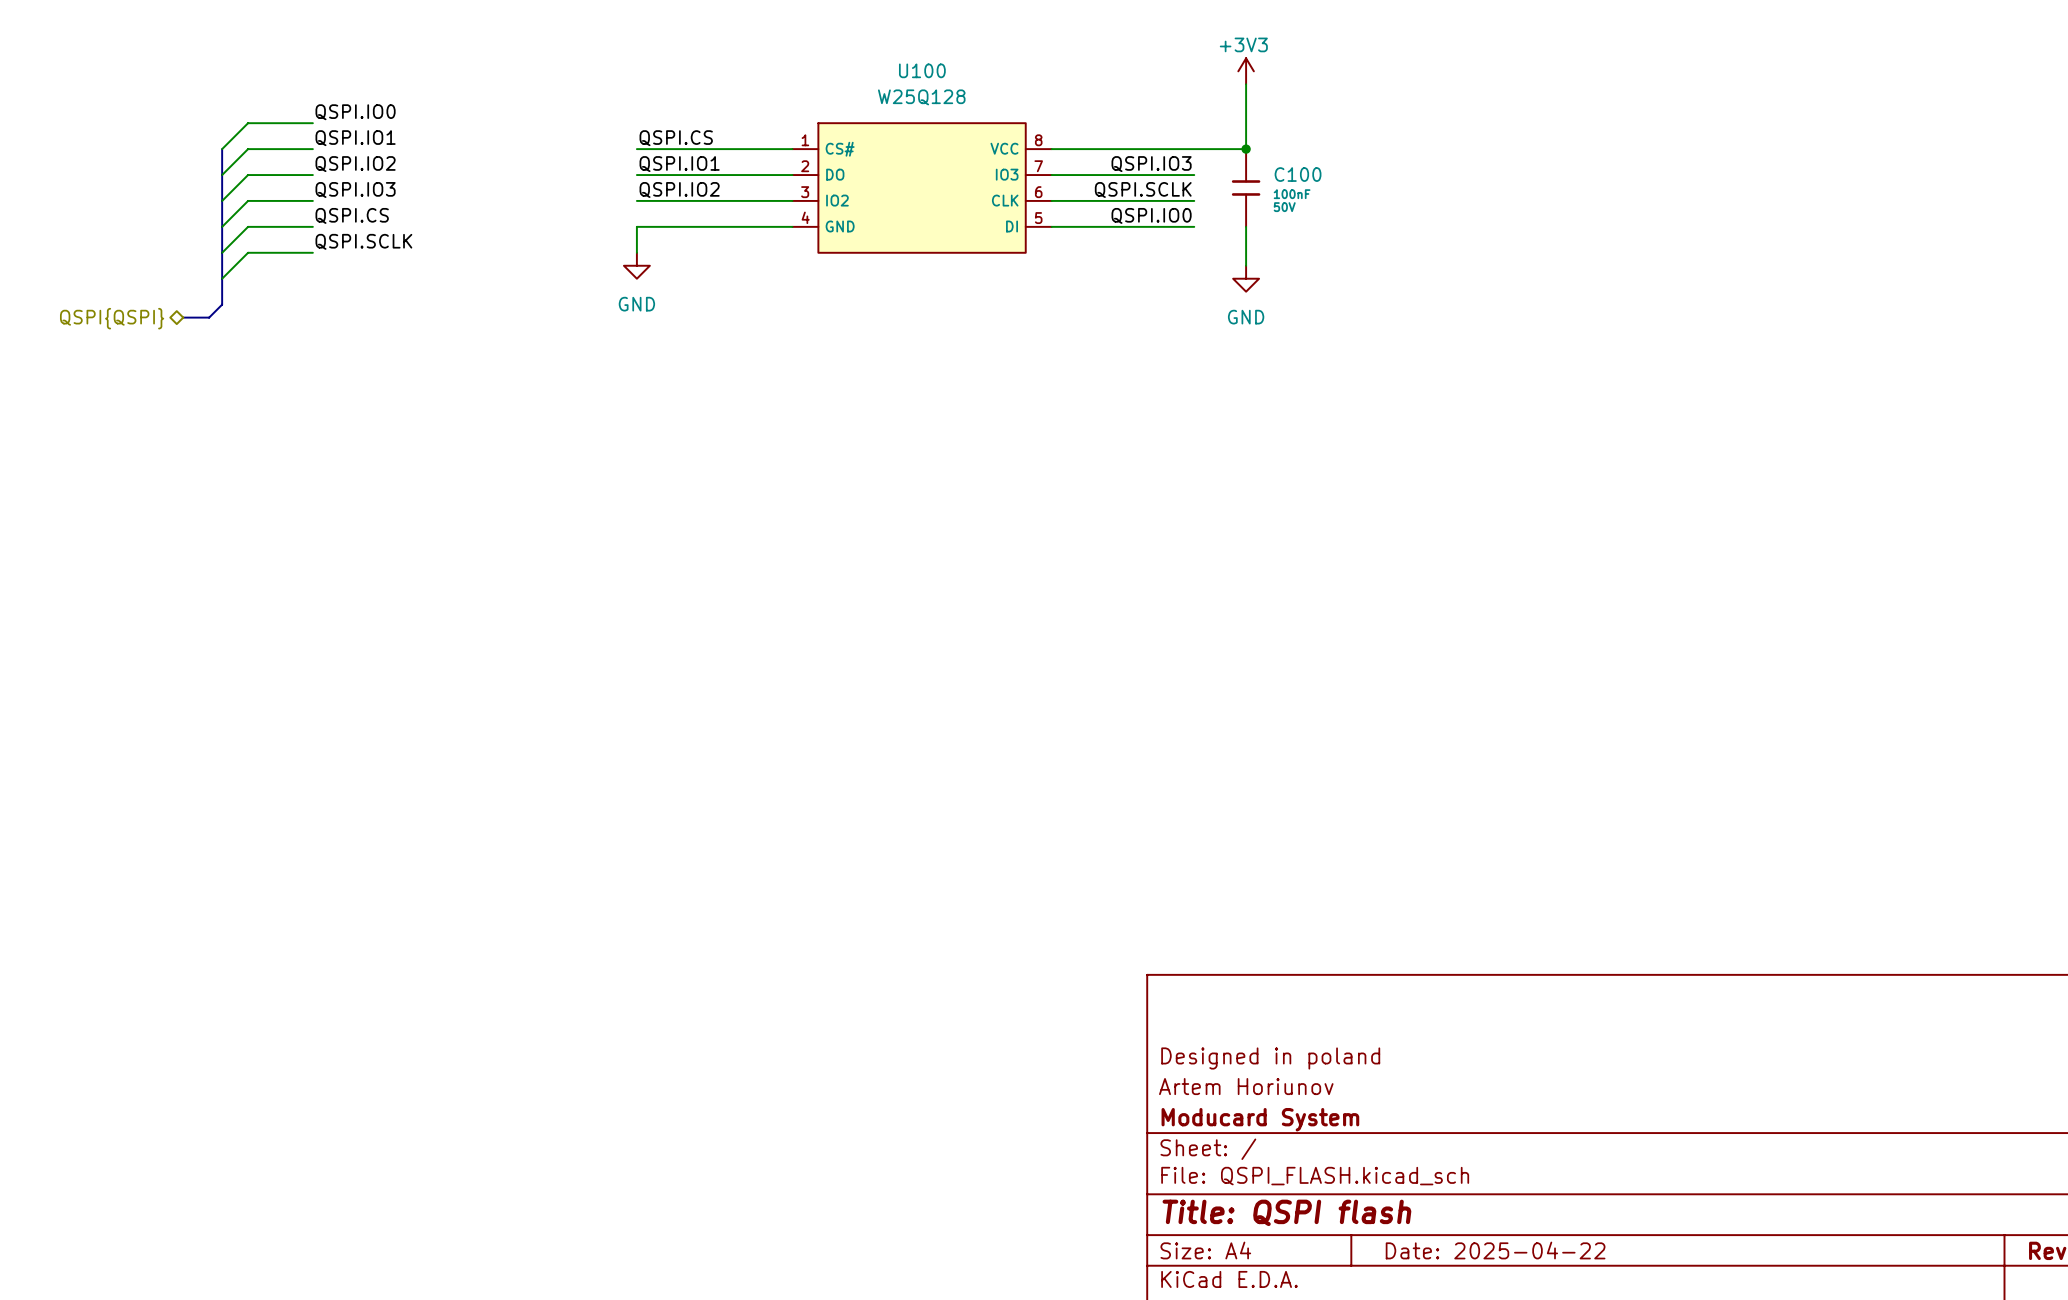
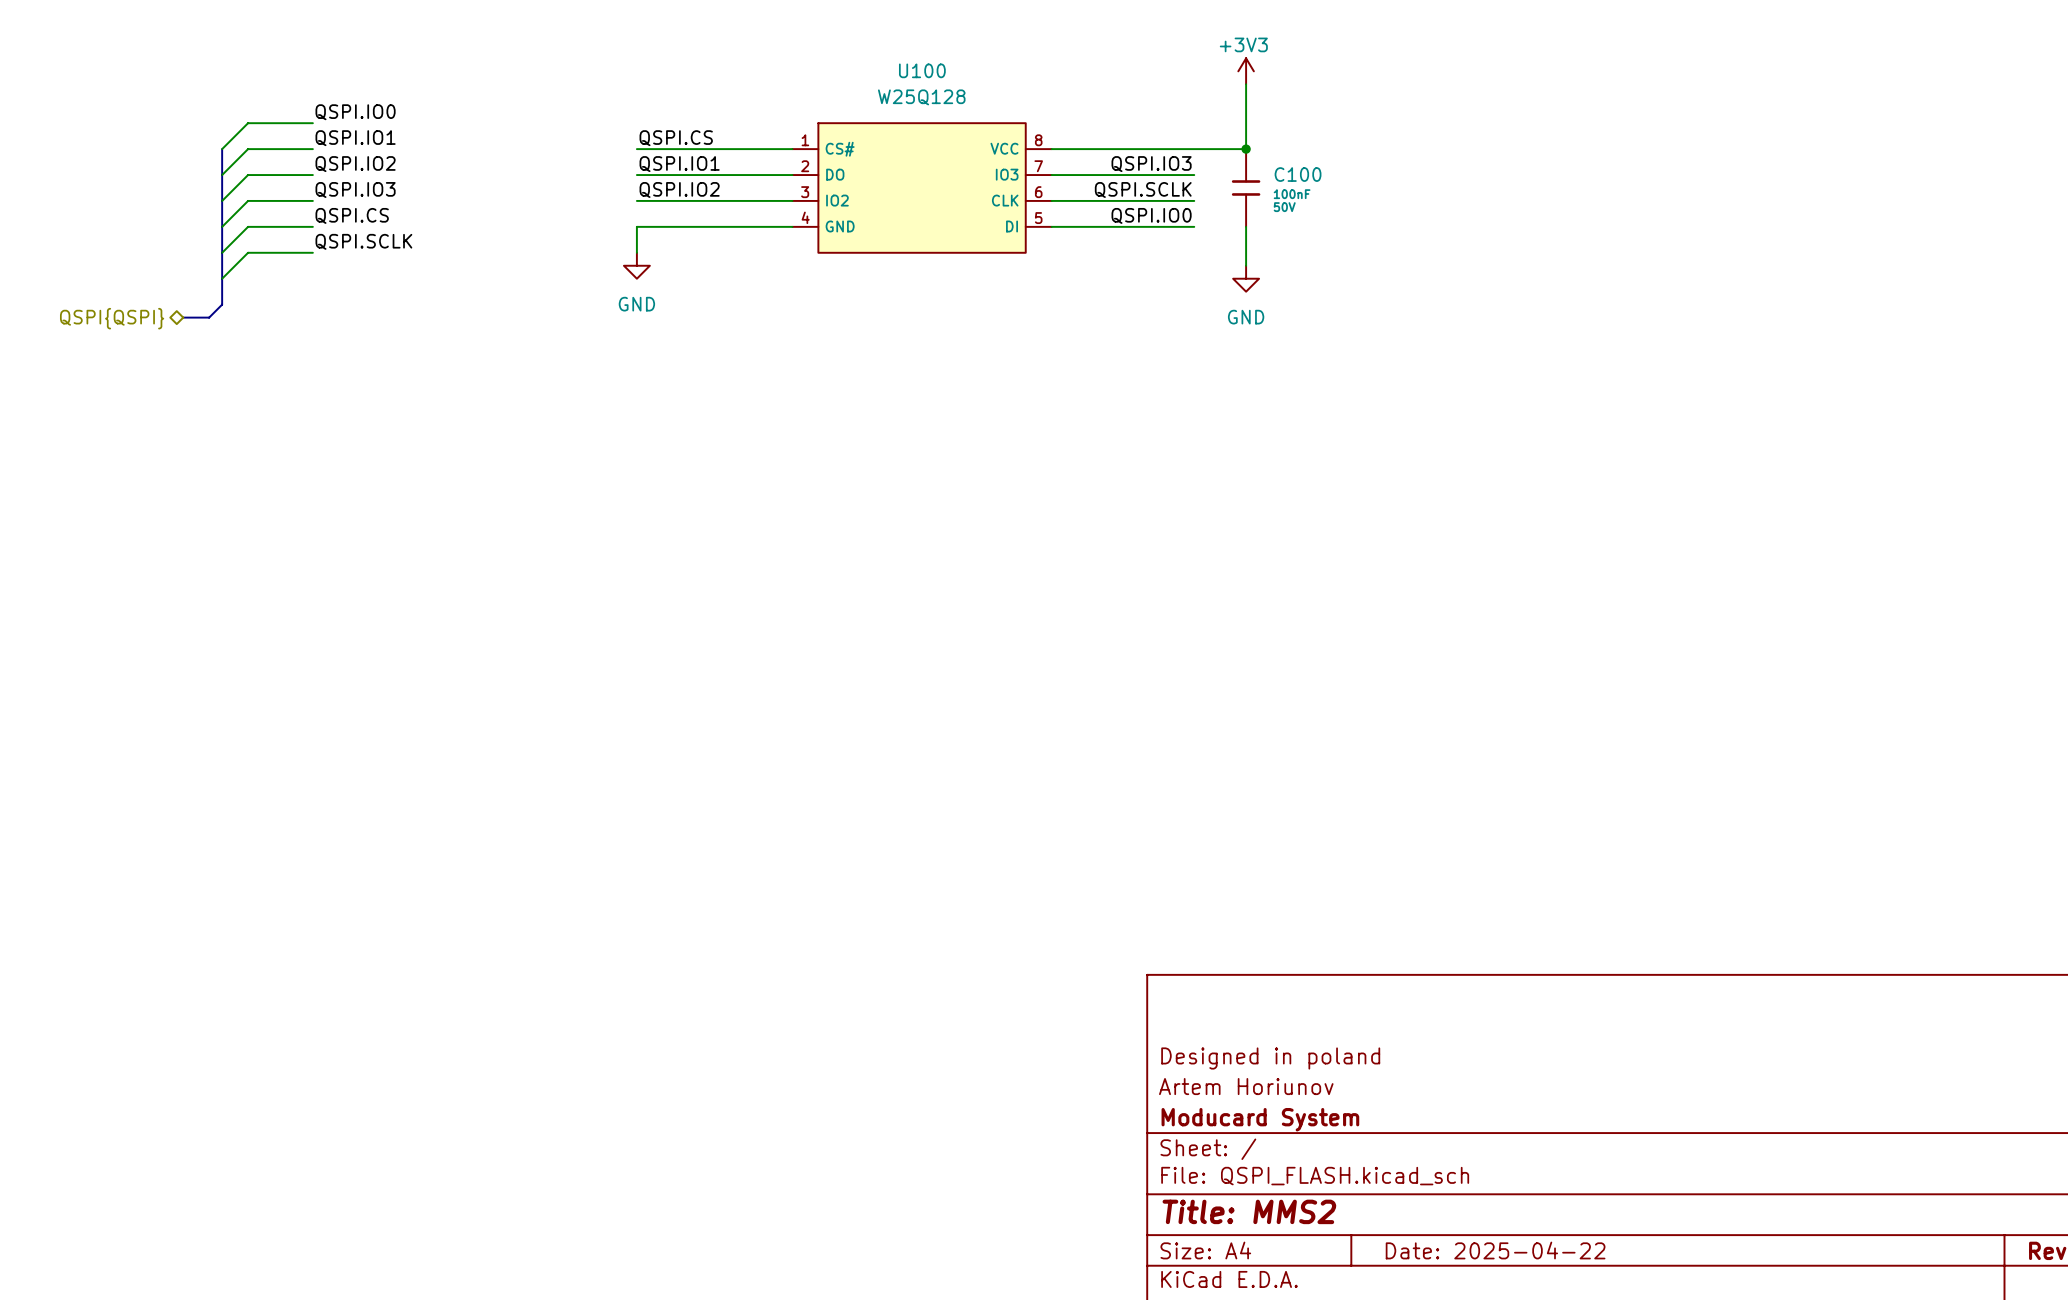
title block: Title: QSPI flash (1286, 1212) -> Title: MMS2 (1249, 1211)

